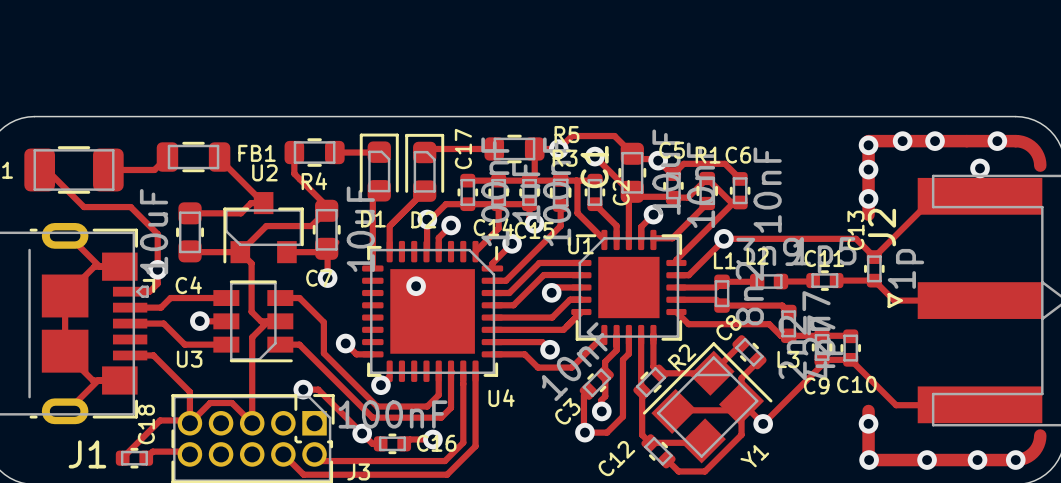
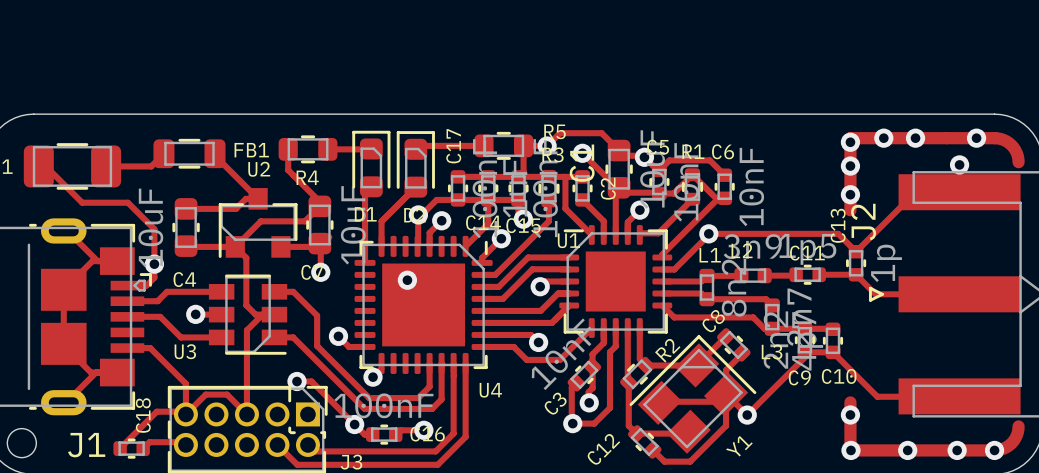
round board edge: none -> [6, 428, 37, 459]

